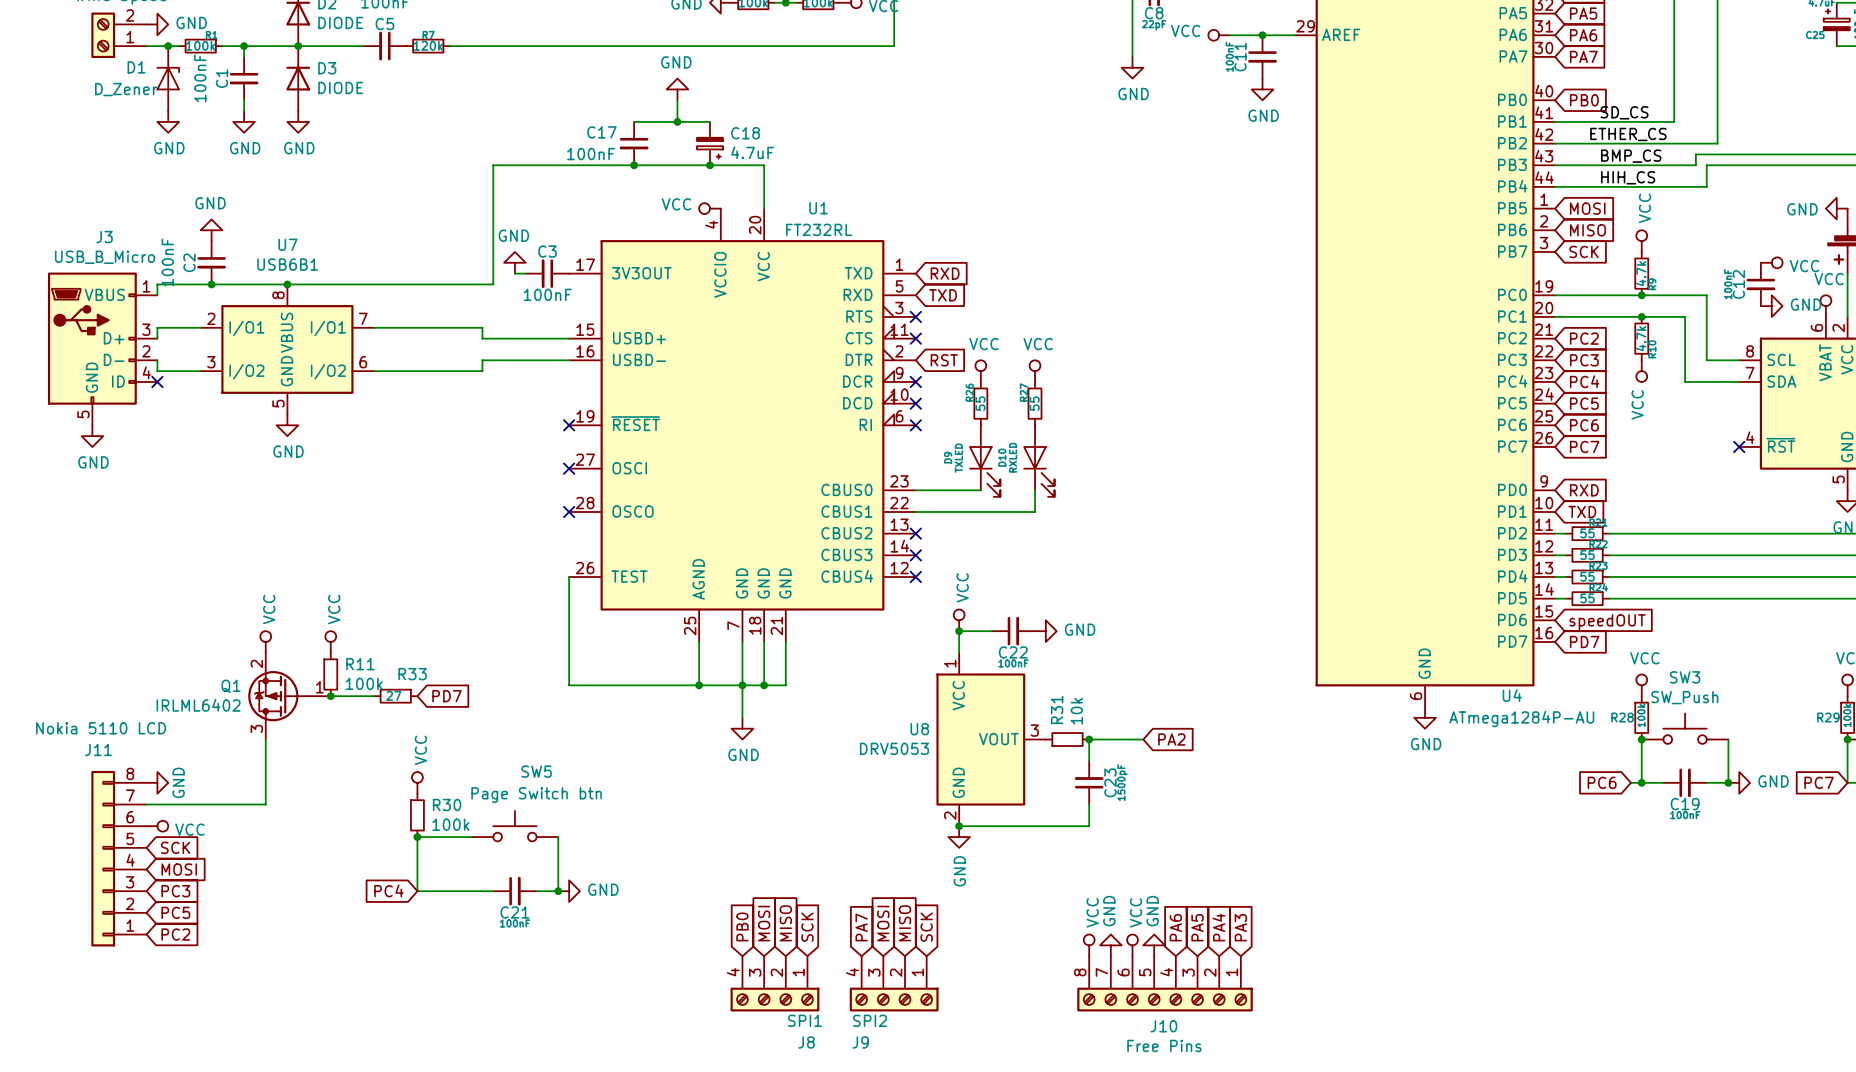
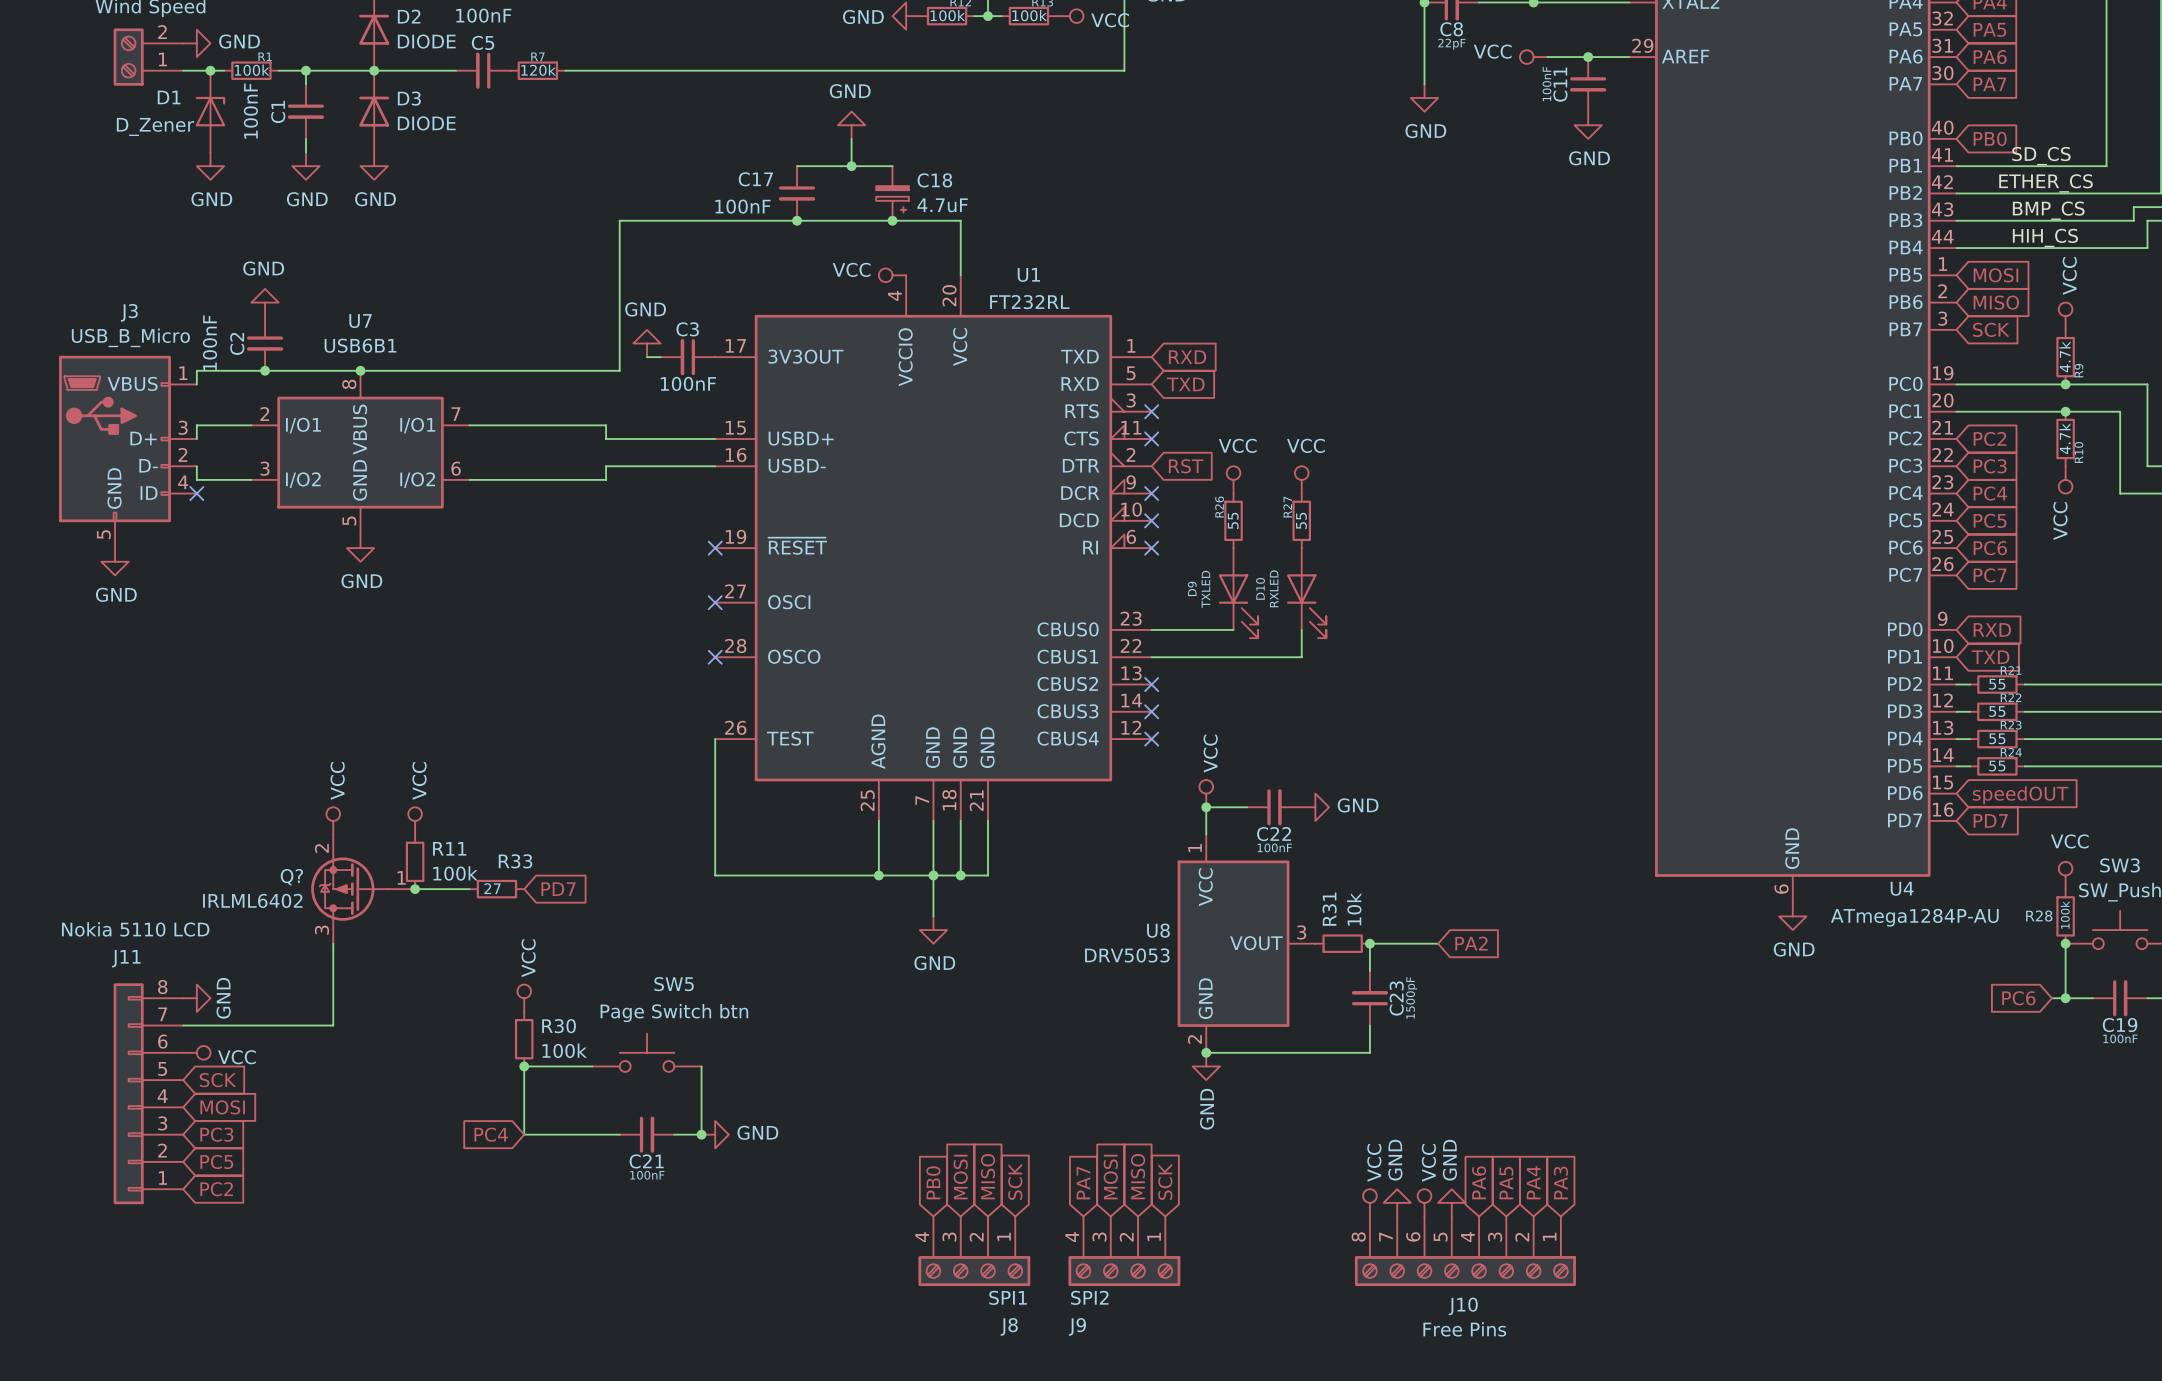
Q1 name: Q1 (231, 686) -> Q? (291, 877)

